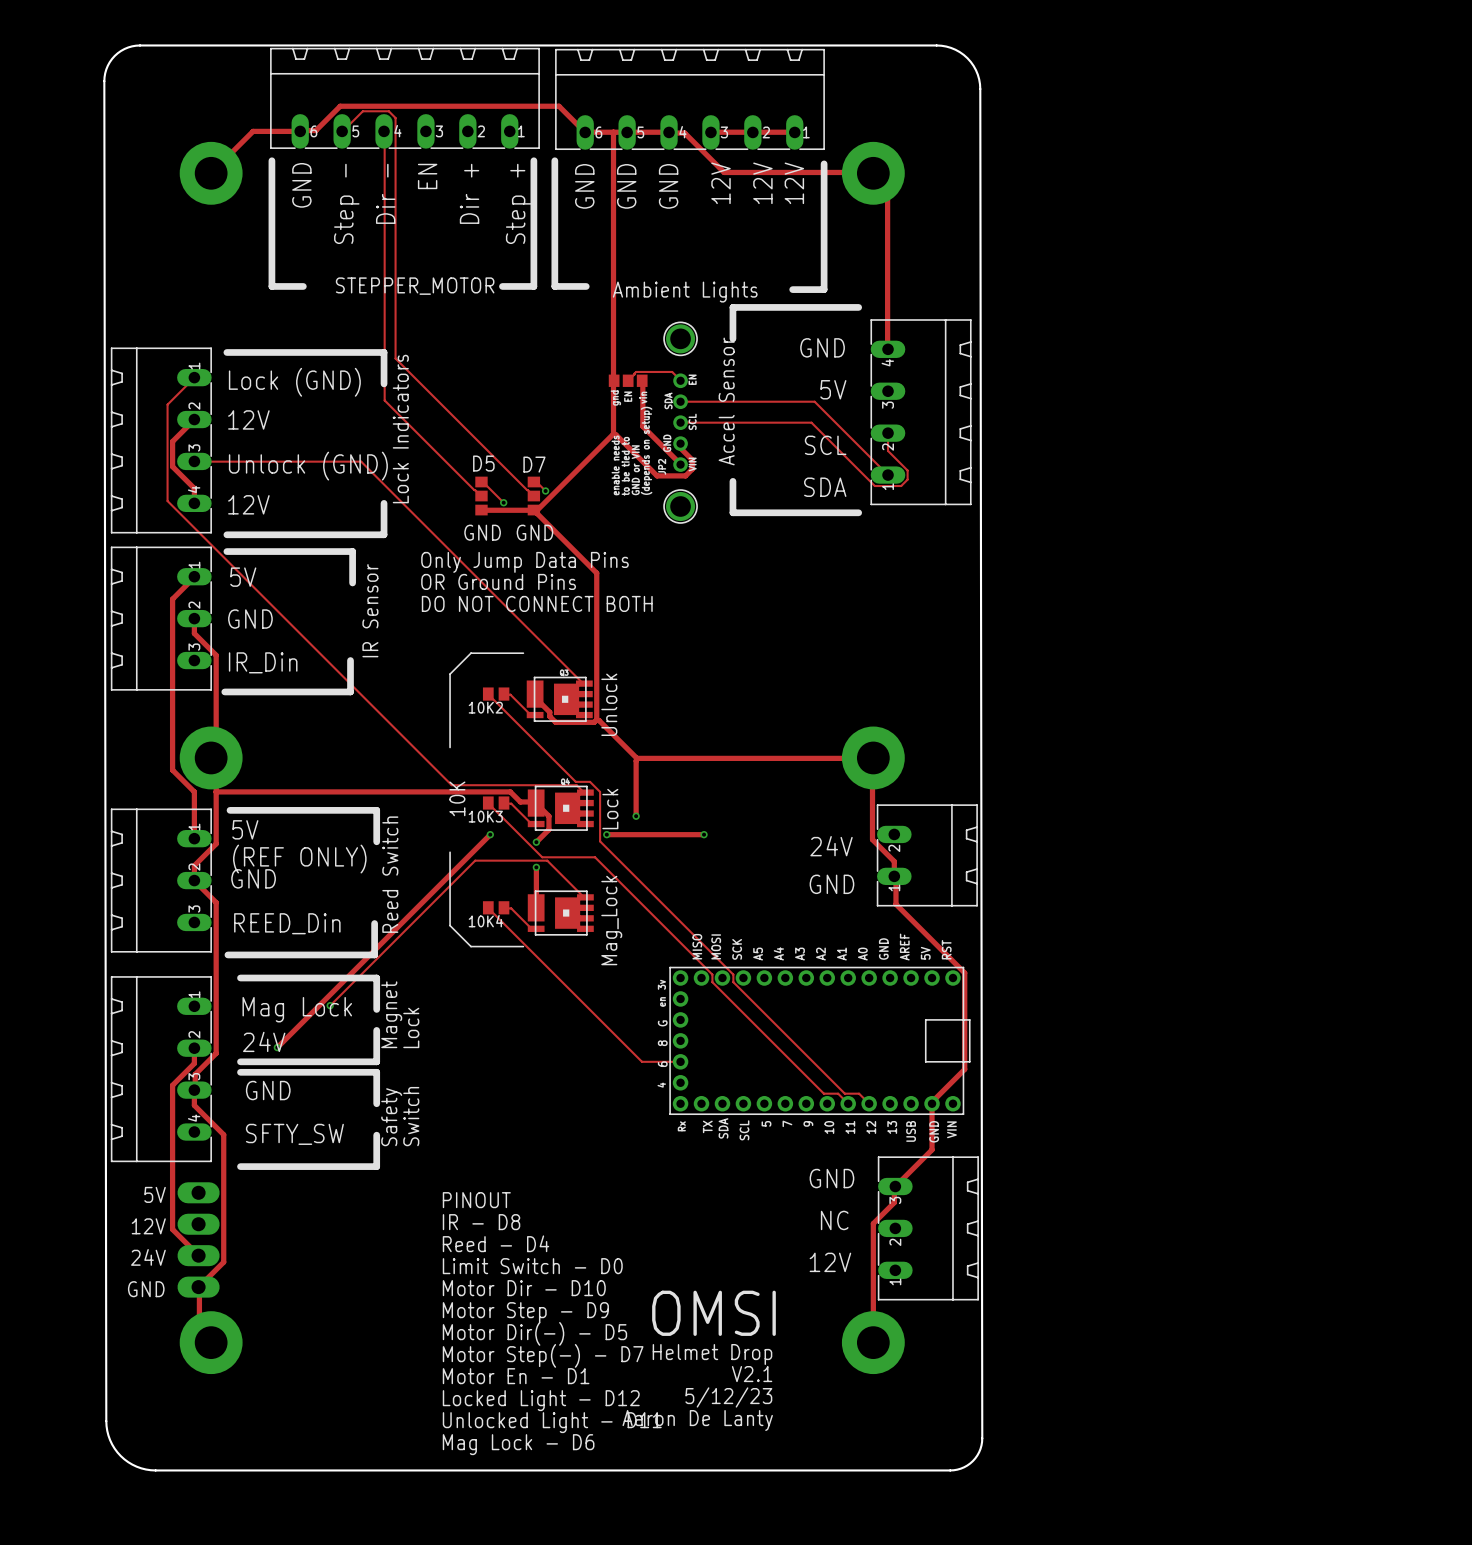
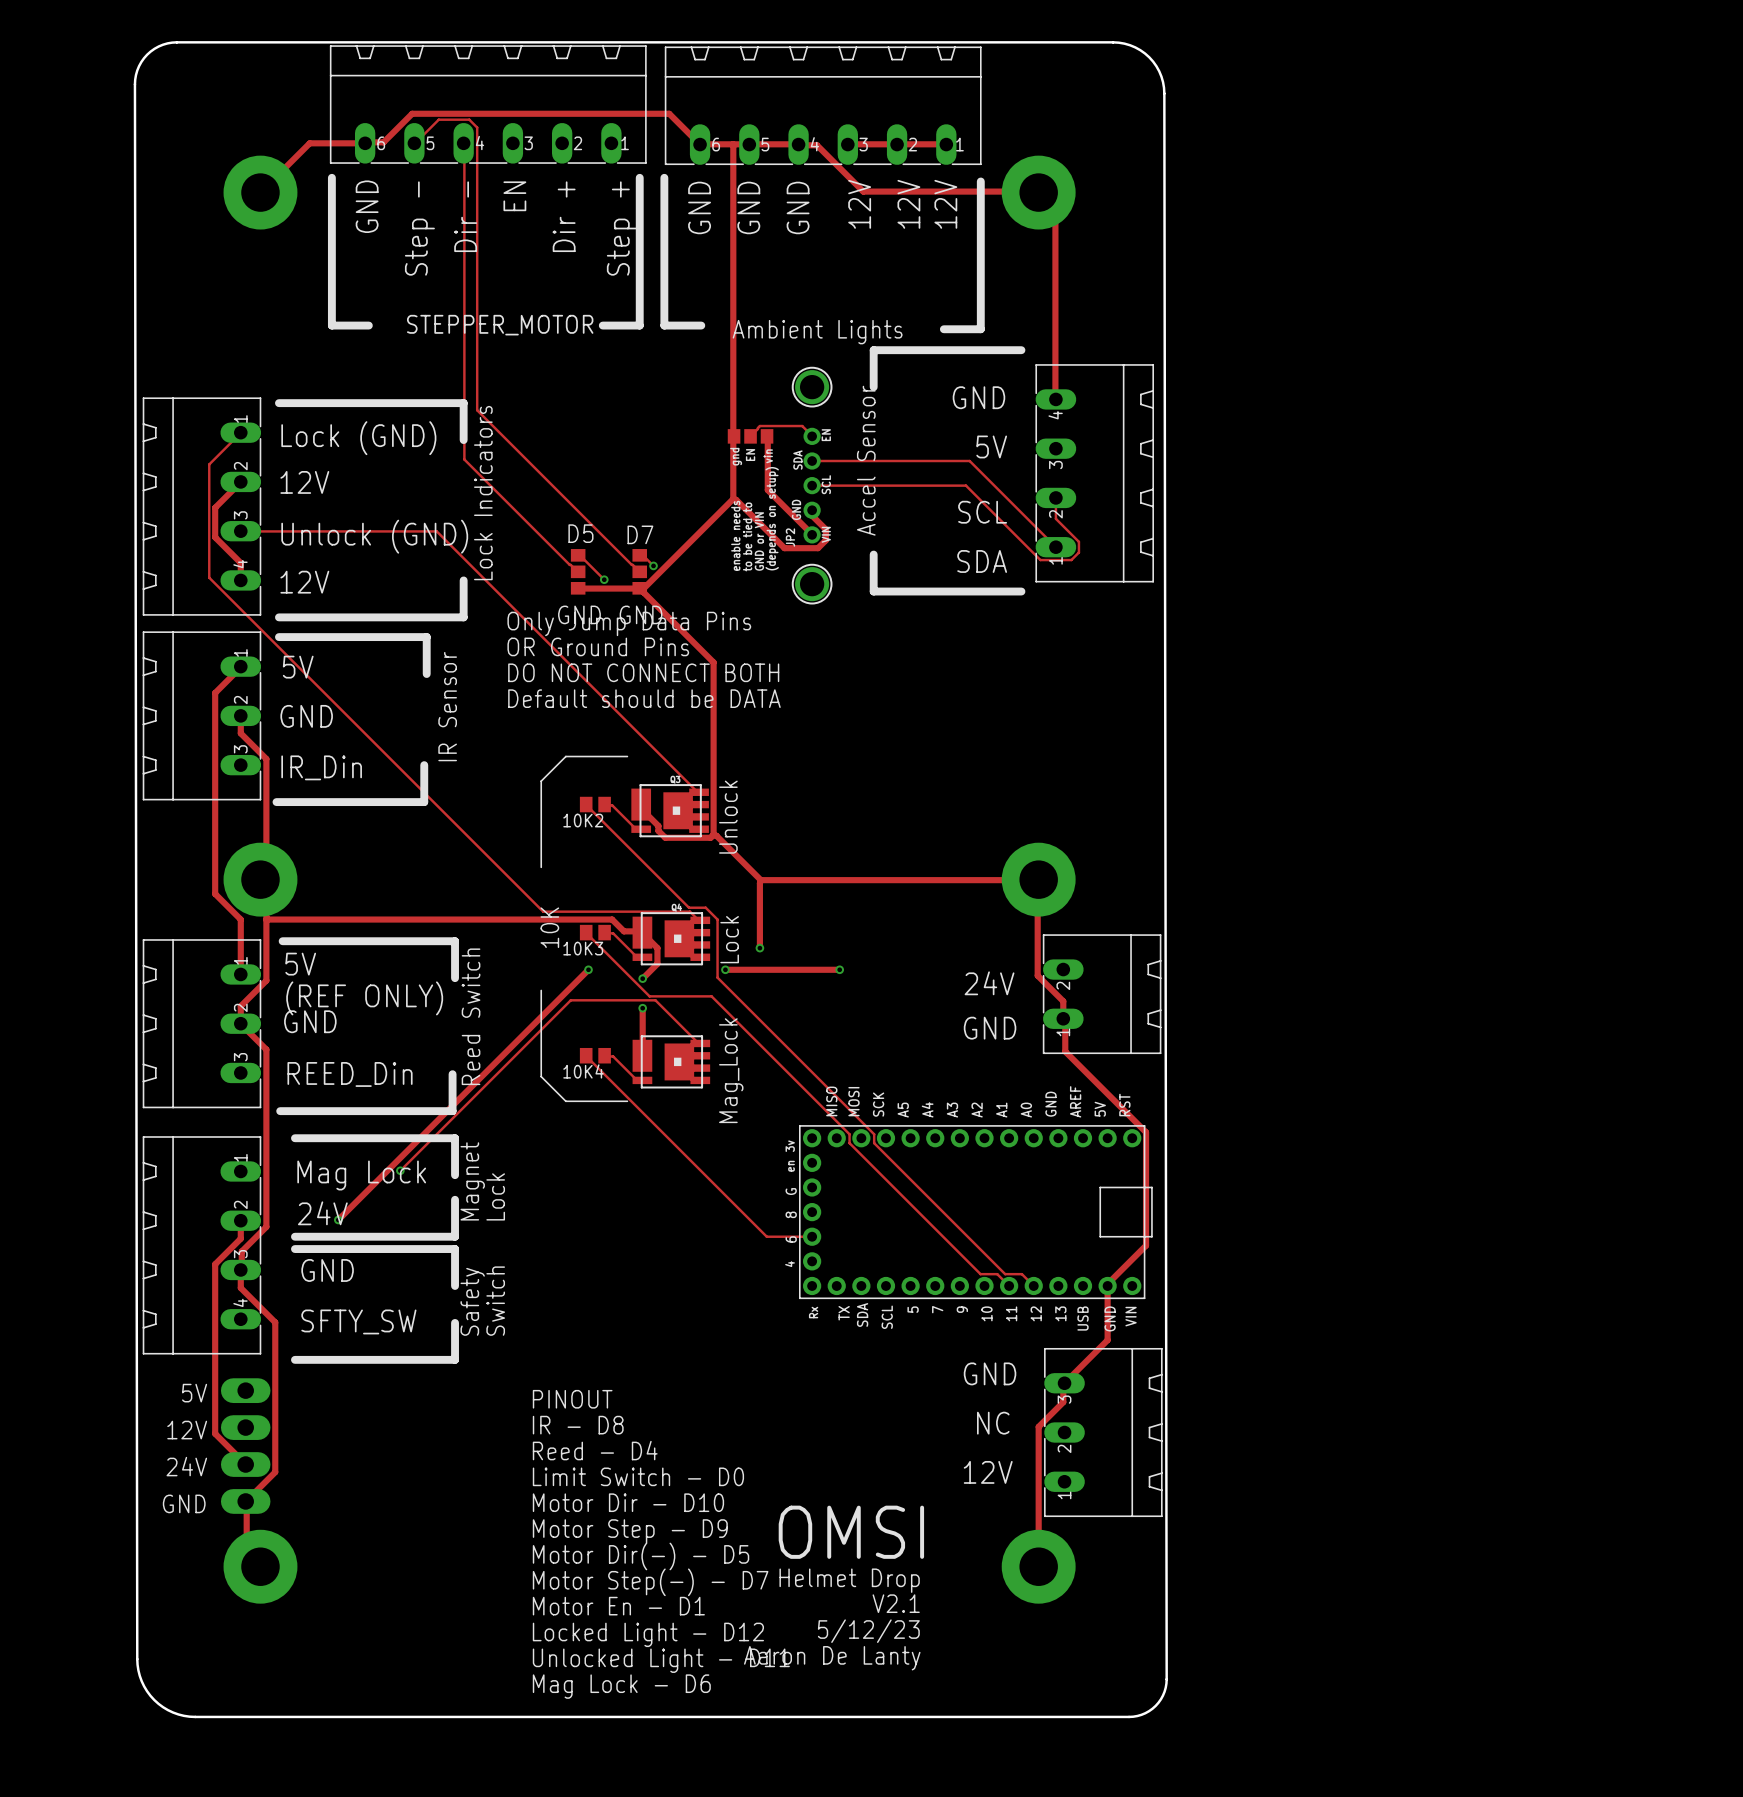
text: none -> Only Jump Data Pins (629, 623)
text: Only Jump Data Pins (525, 562) -> OR Ground Pins (598, 646)
text: OR Ground Pins (498, 581) -> DO NOT CONNECT BOTH (643, 672)
text: DO NOT CONNECT BOTH (537, 603) -> Default should be DATA (644, 698)

